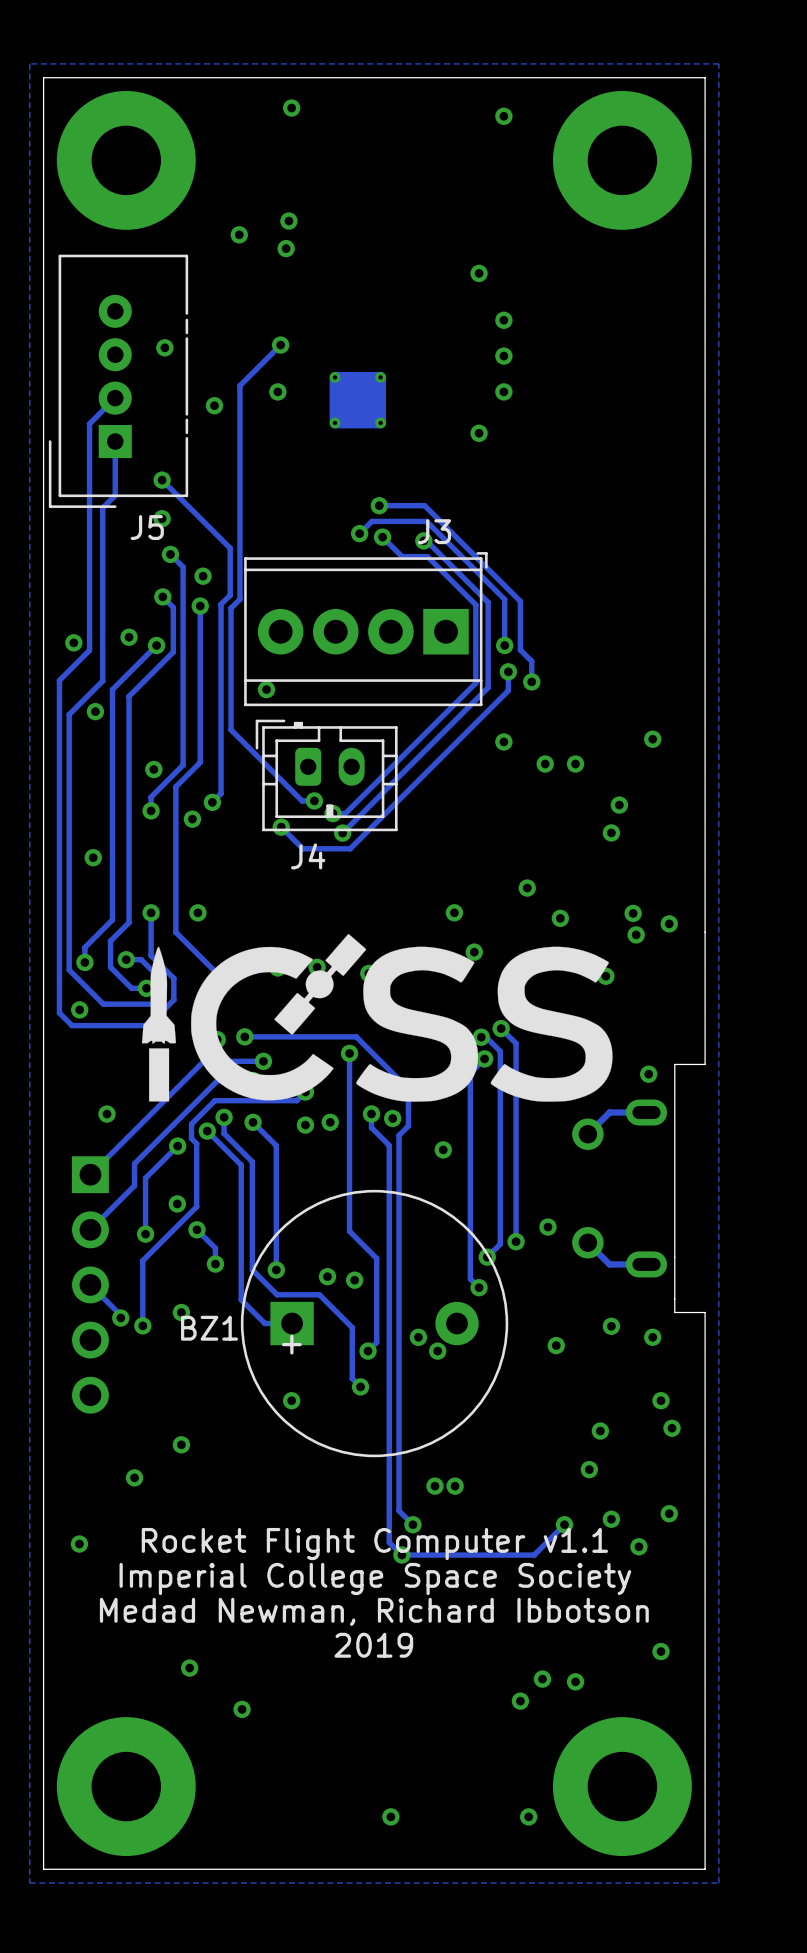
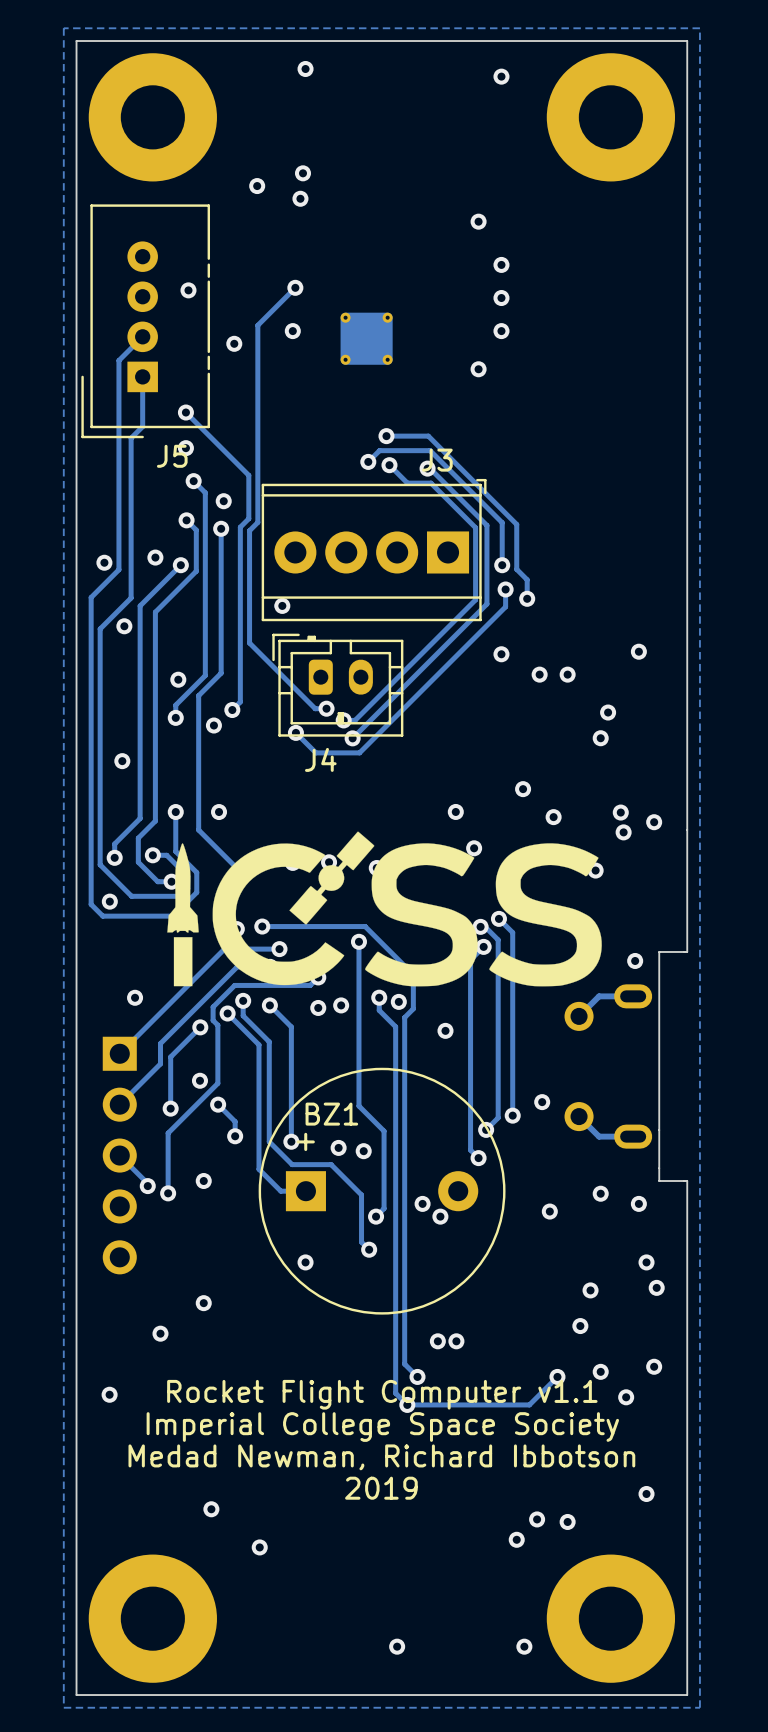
BZ1 name position: BZ1 (209, 1328) -> BZ1 (331, 1114)
BZ1 text position: + (291, 1344) -> + (305, 1141)

